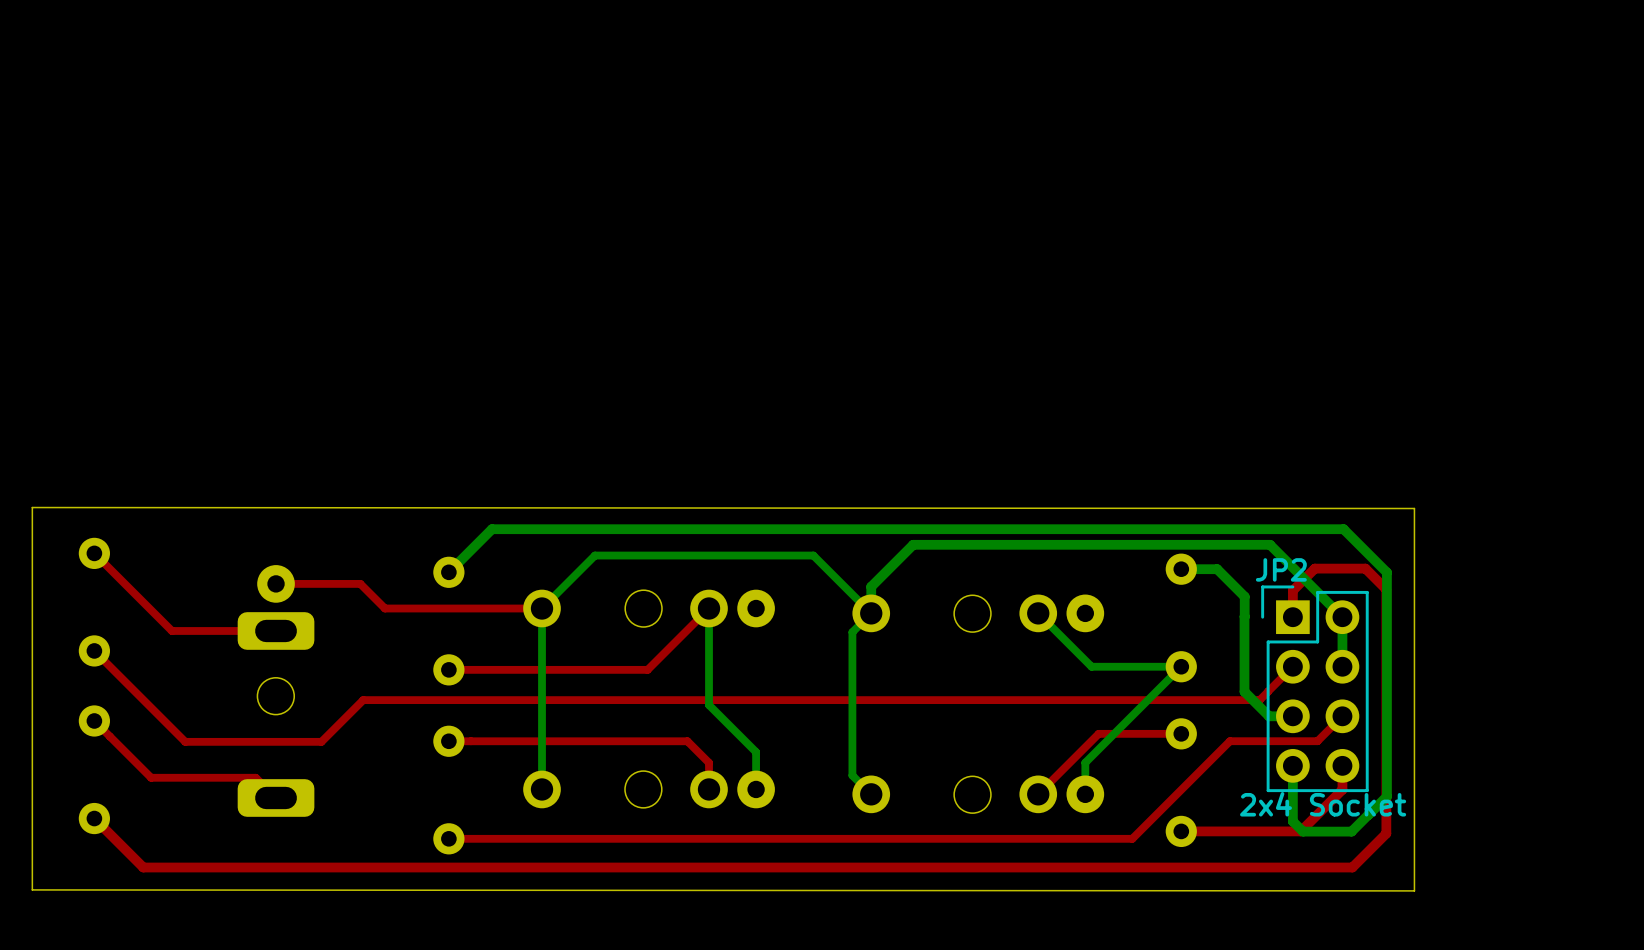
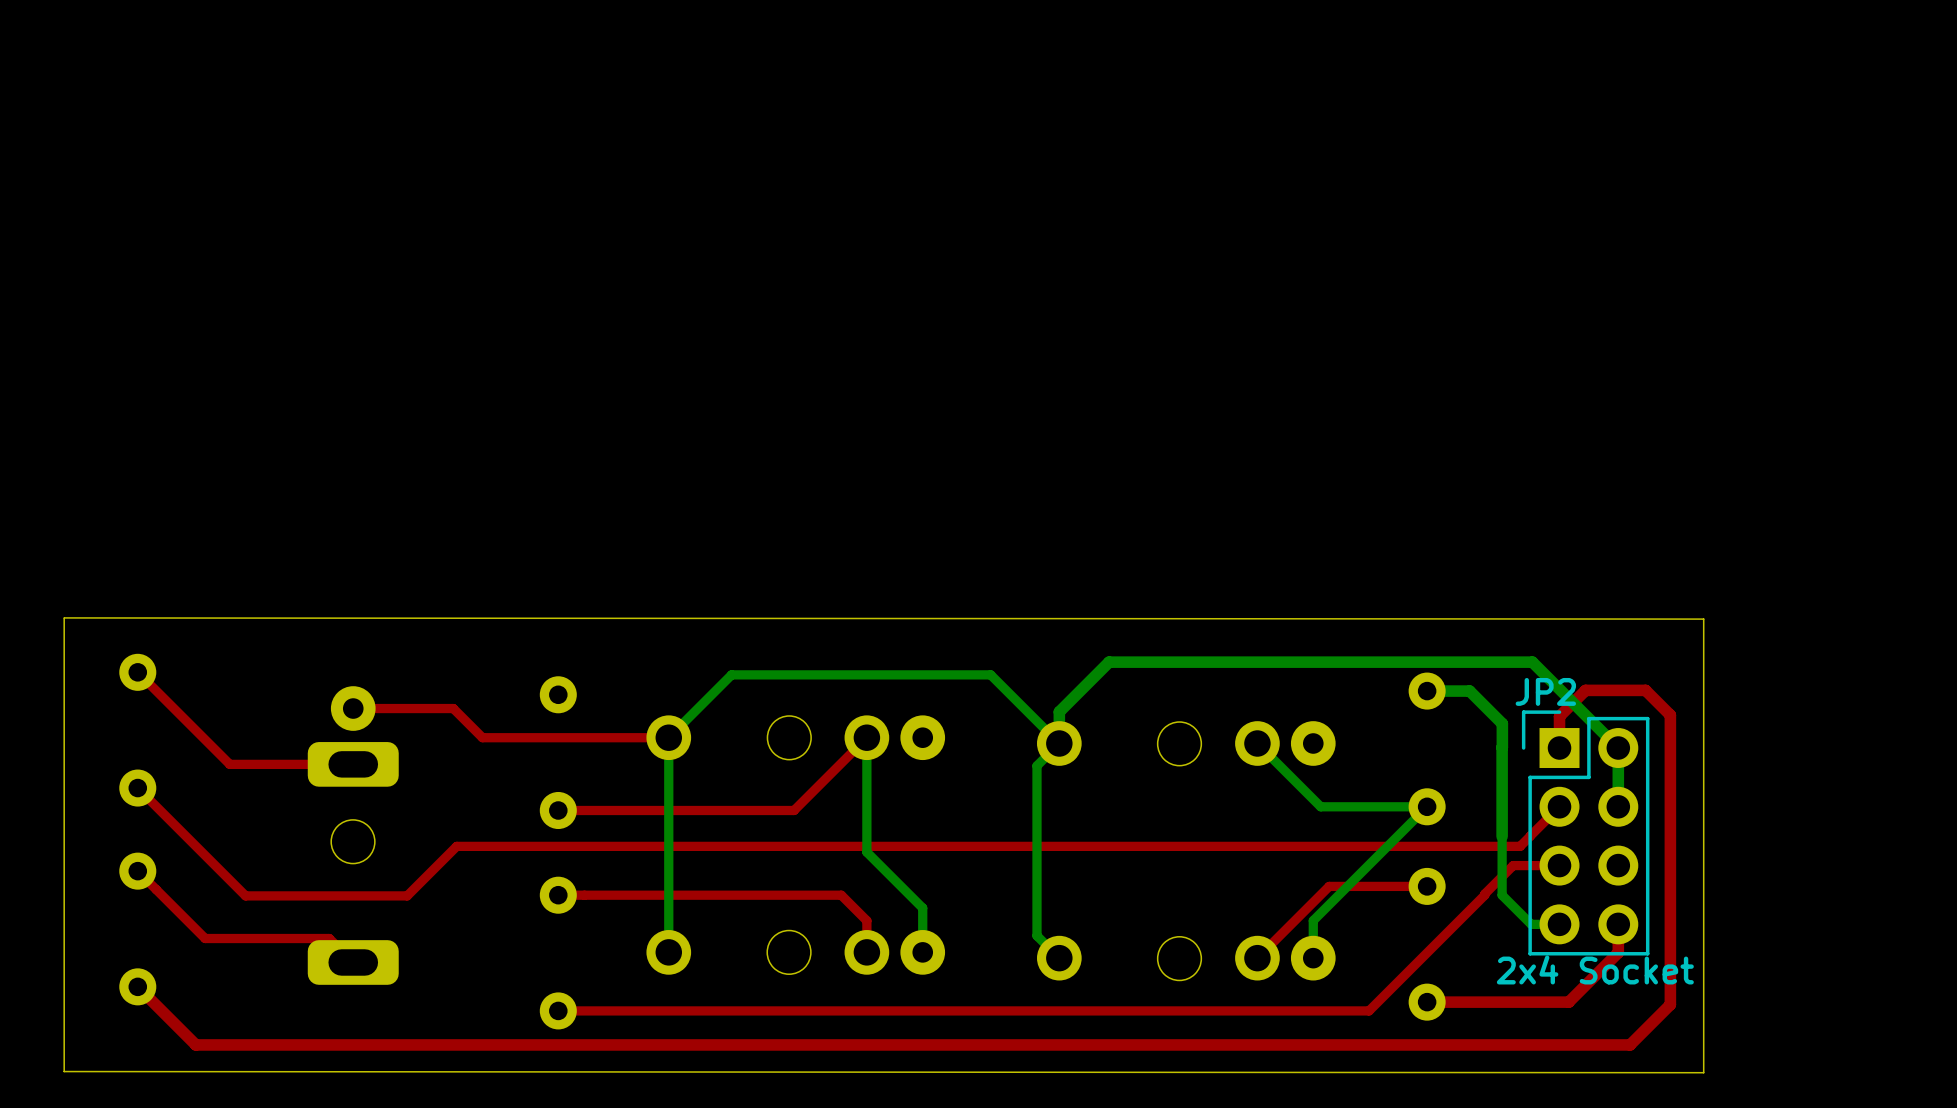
bottom track: (448, 572) (492, 529) (1343, 529) (1386, 572) (1386, 796) (1368, 815) -> none
bottom track: (1244, 691) (1269, 716) (1292, 716) -> (1502, 836) (1502, 895) (1531, 924) (1559, 924)
top track: (1342, 716) (1317, 741) (1229, 741) -> (1559, 865) (1513, 865) (1484, 895)
bottom track: (1292, 765) (1292, 821) (1303, 831) (1351, 831) (1368, 815) -> none

